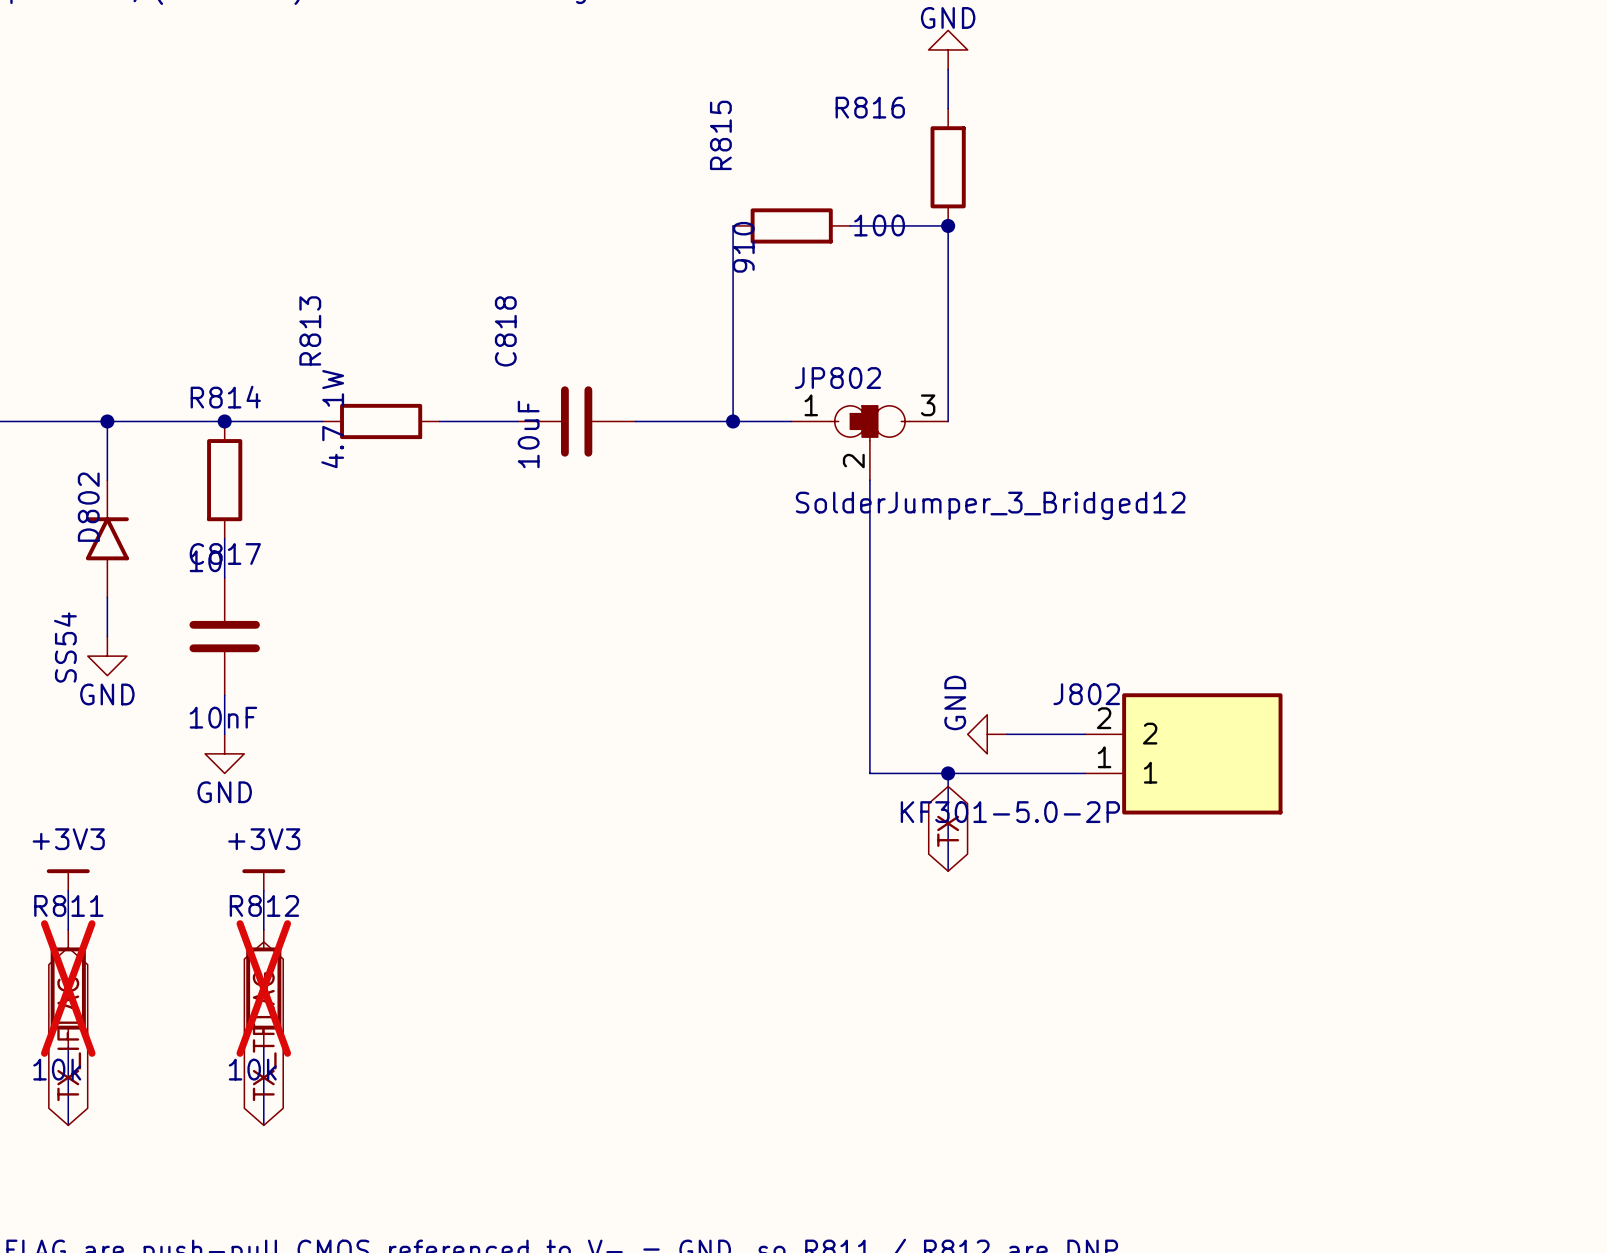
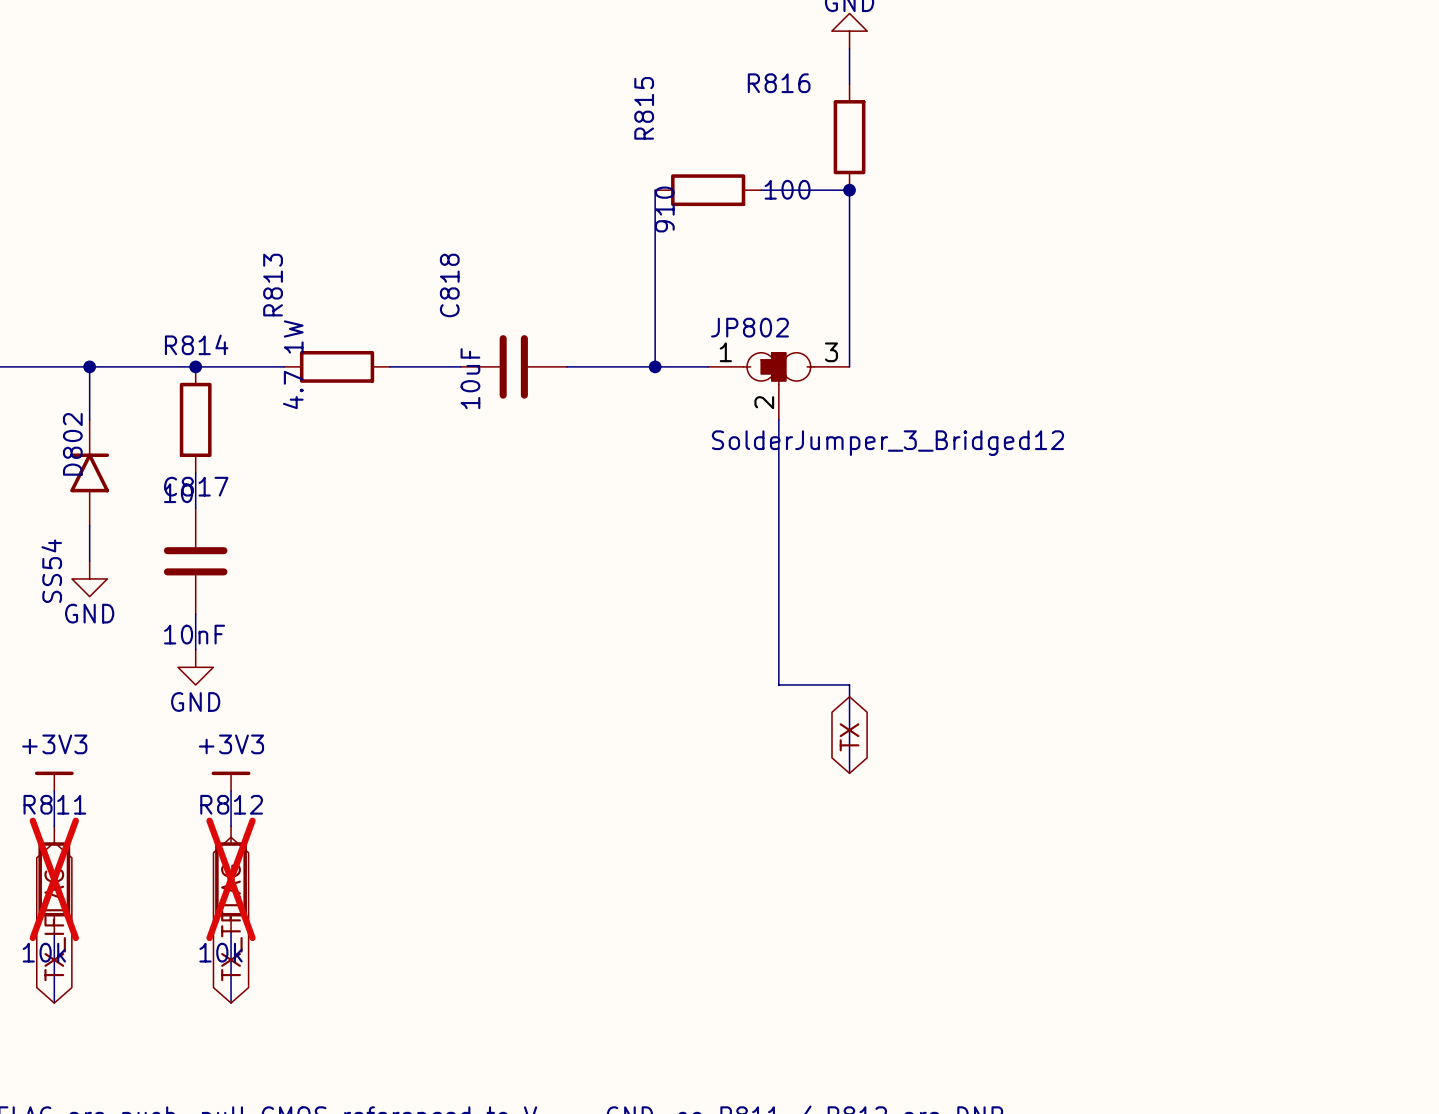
power symbol: GND (987, 734) -> none
wire: (1006, 734) (1085, 734) -> none
J802: KF301-5.0-2P (1183, 753) -> none
wire: (948, 773) (1085, 773) -> none
junction: (948, 773) -> none

